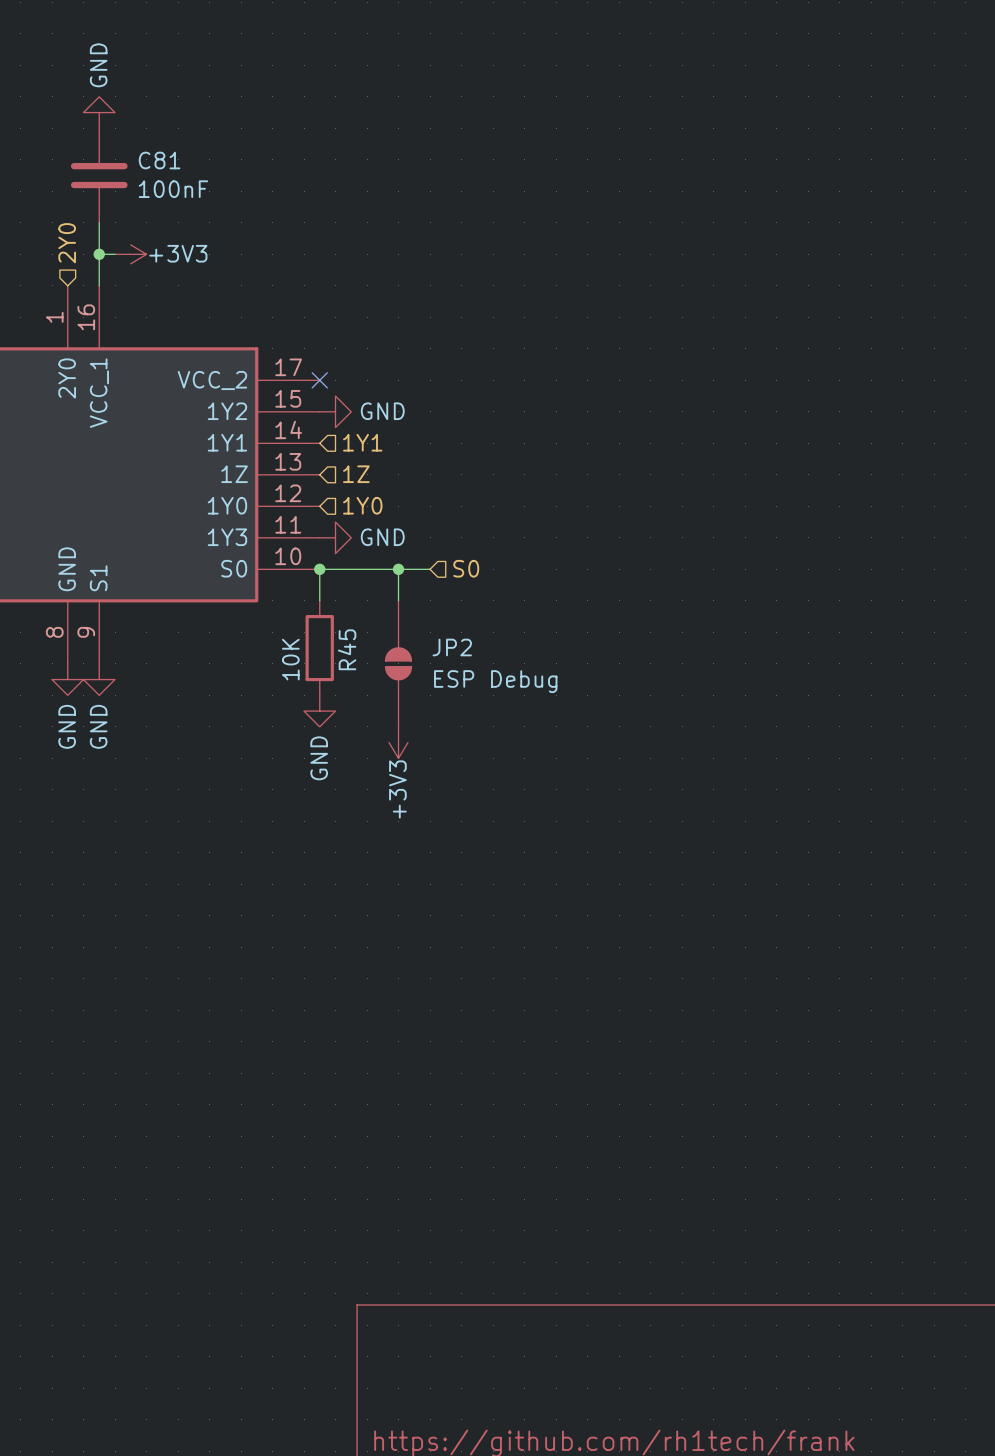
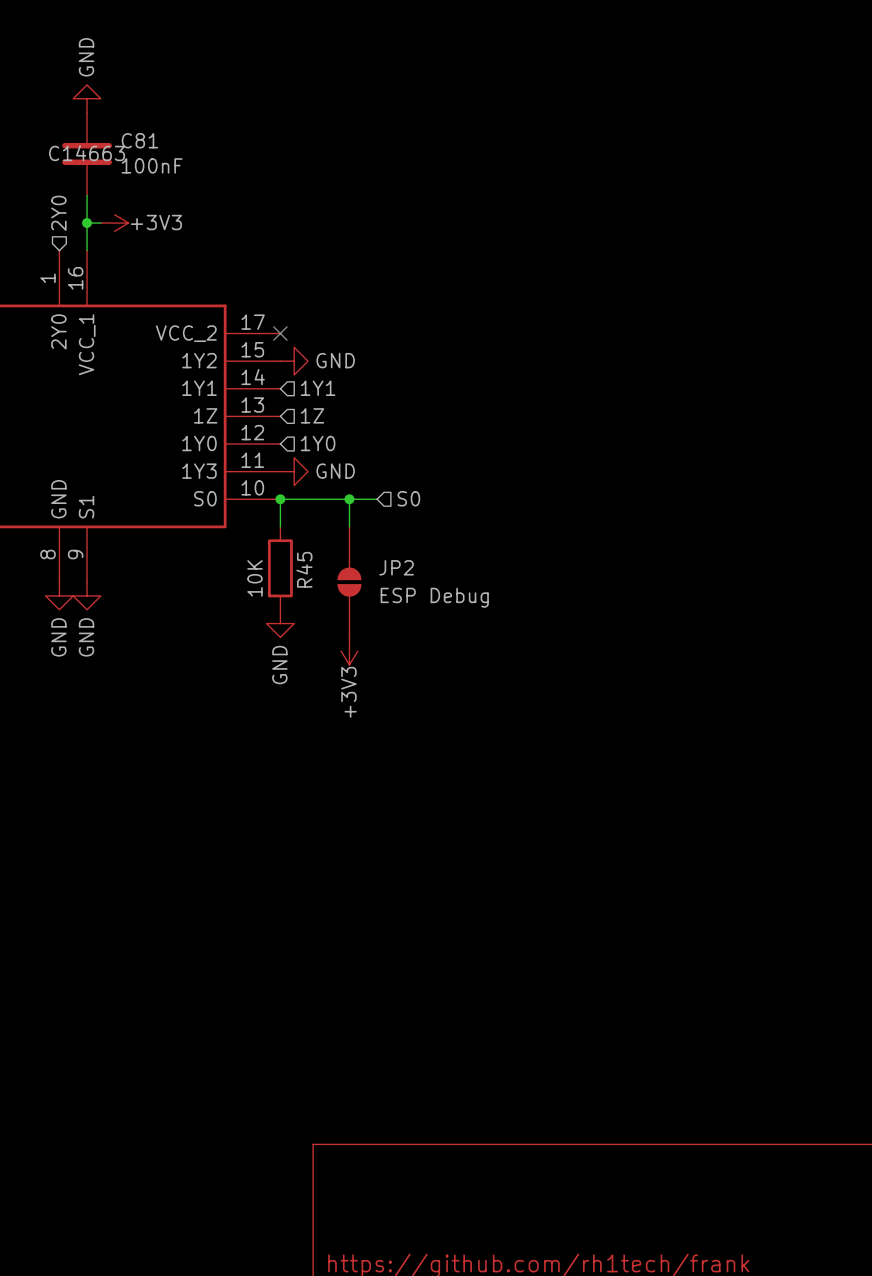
C81 text: none -> C14663 (87, 153)

